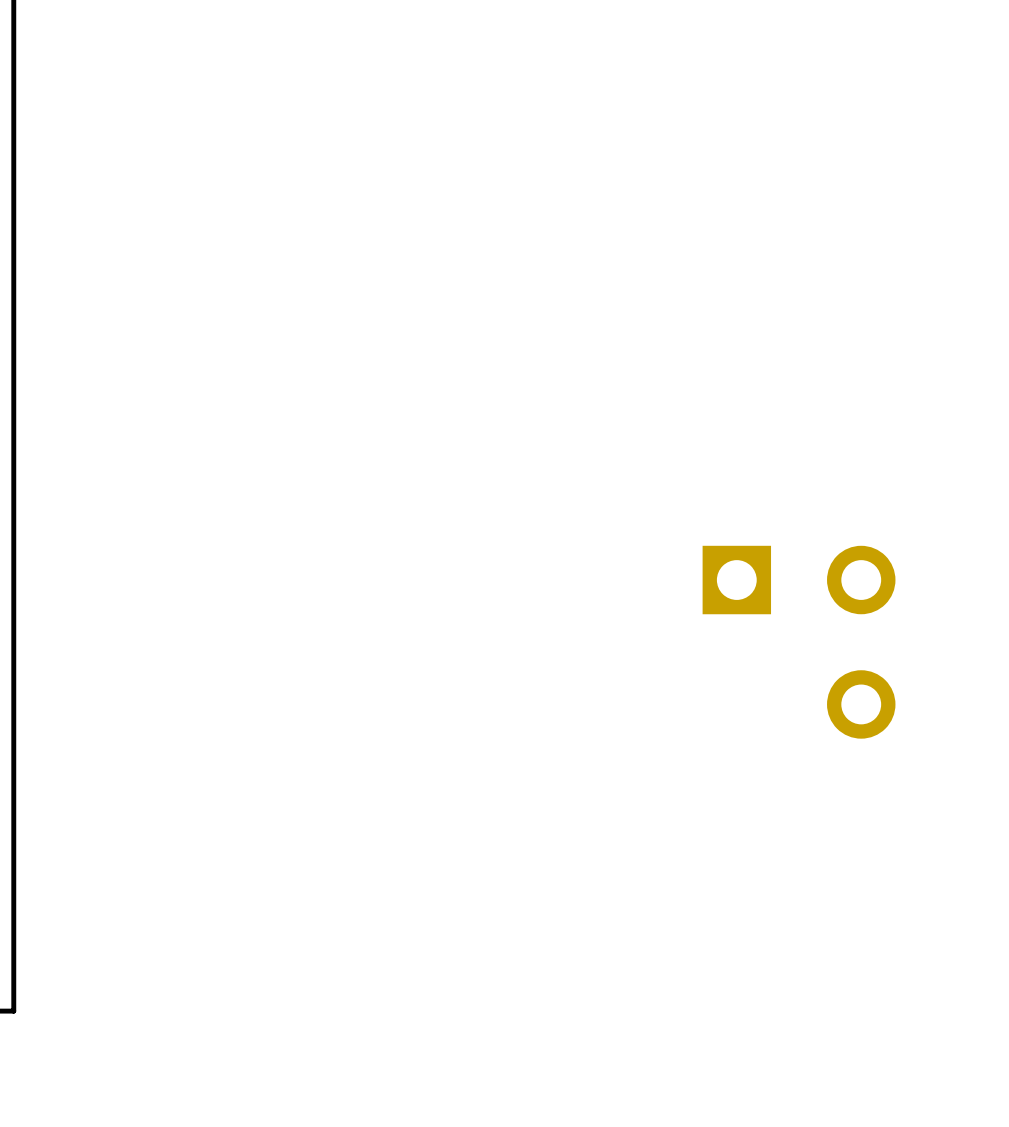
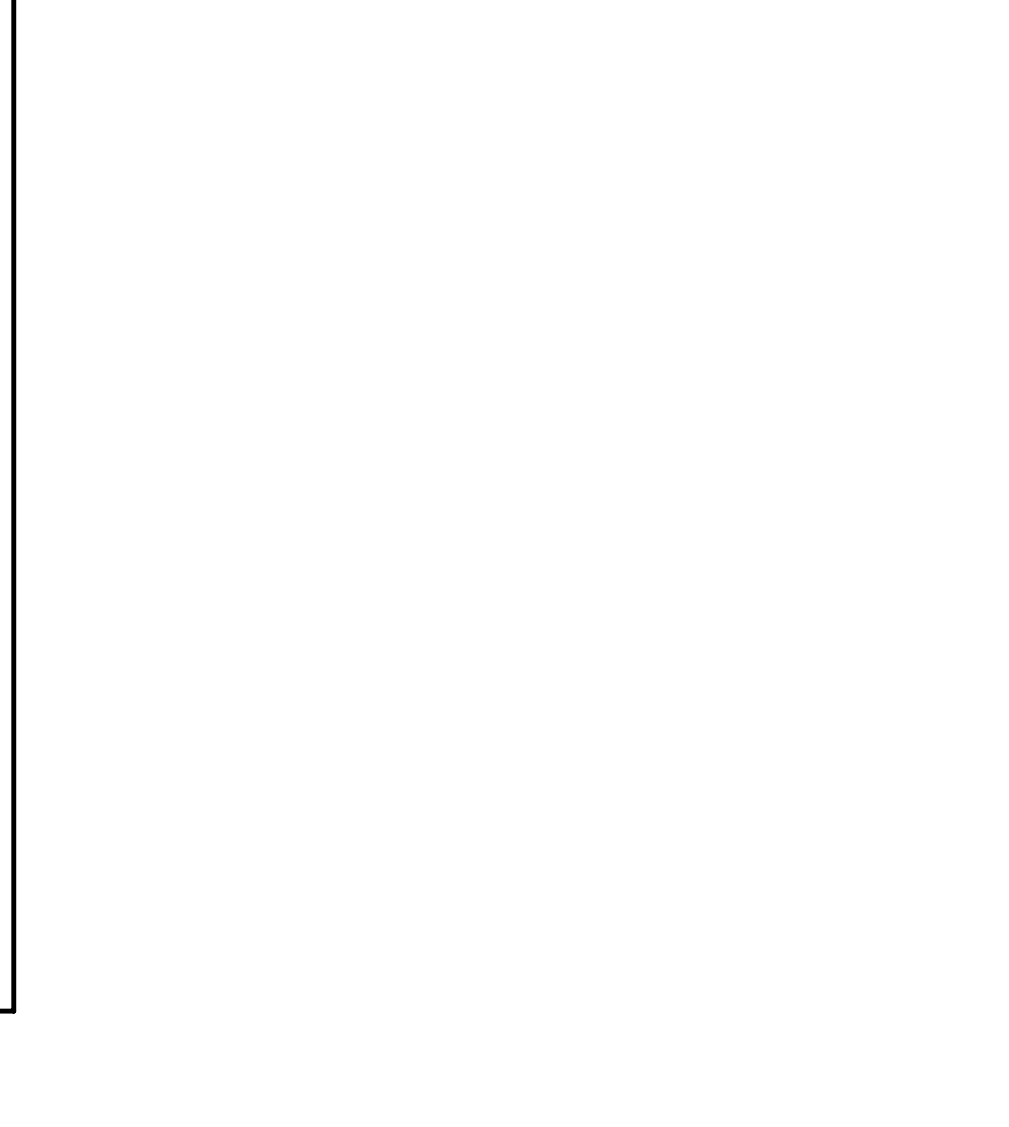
part: (799, 642) -> none

